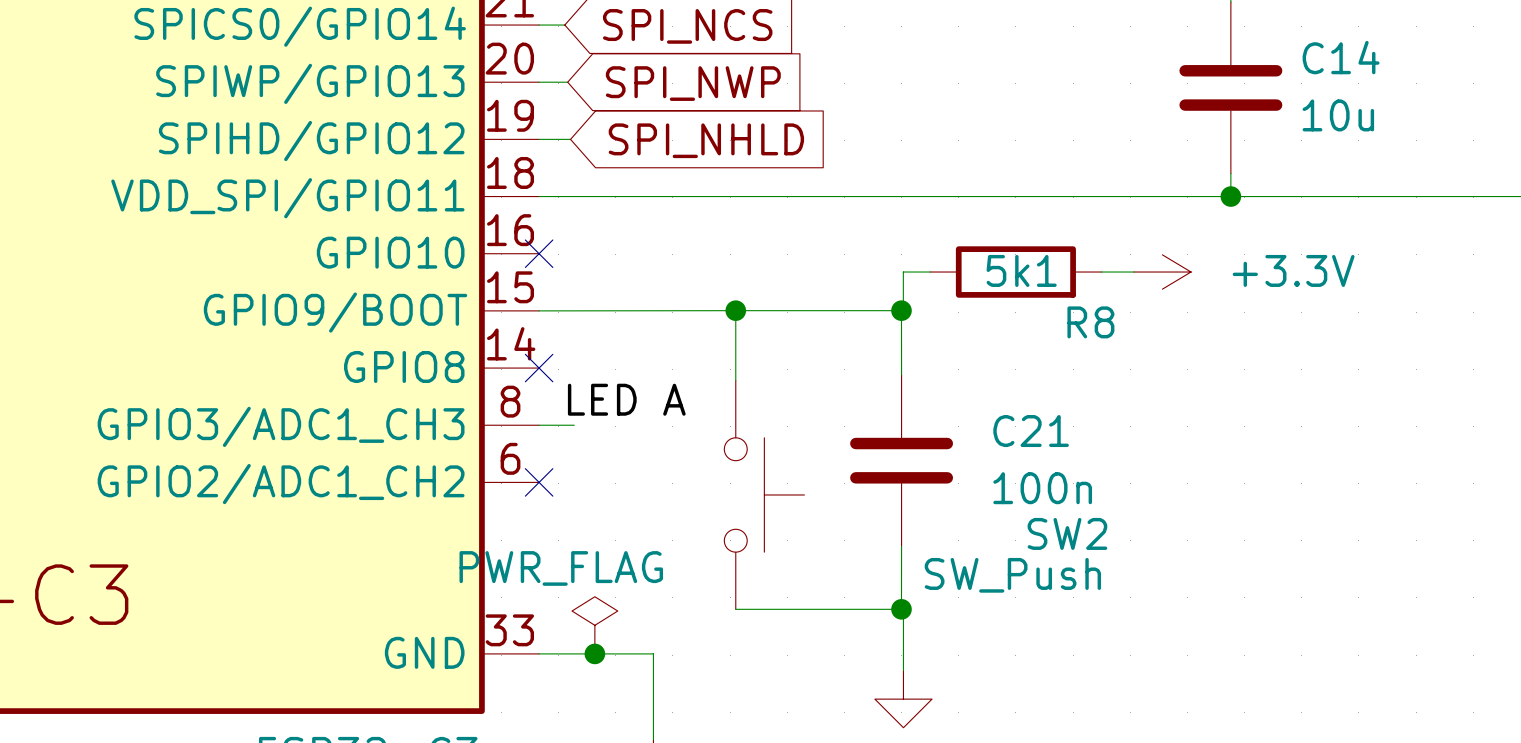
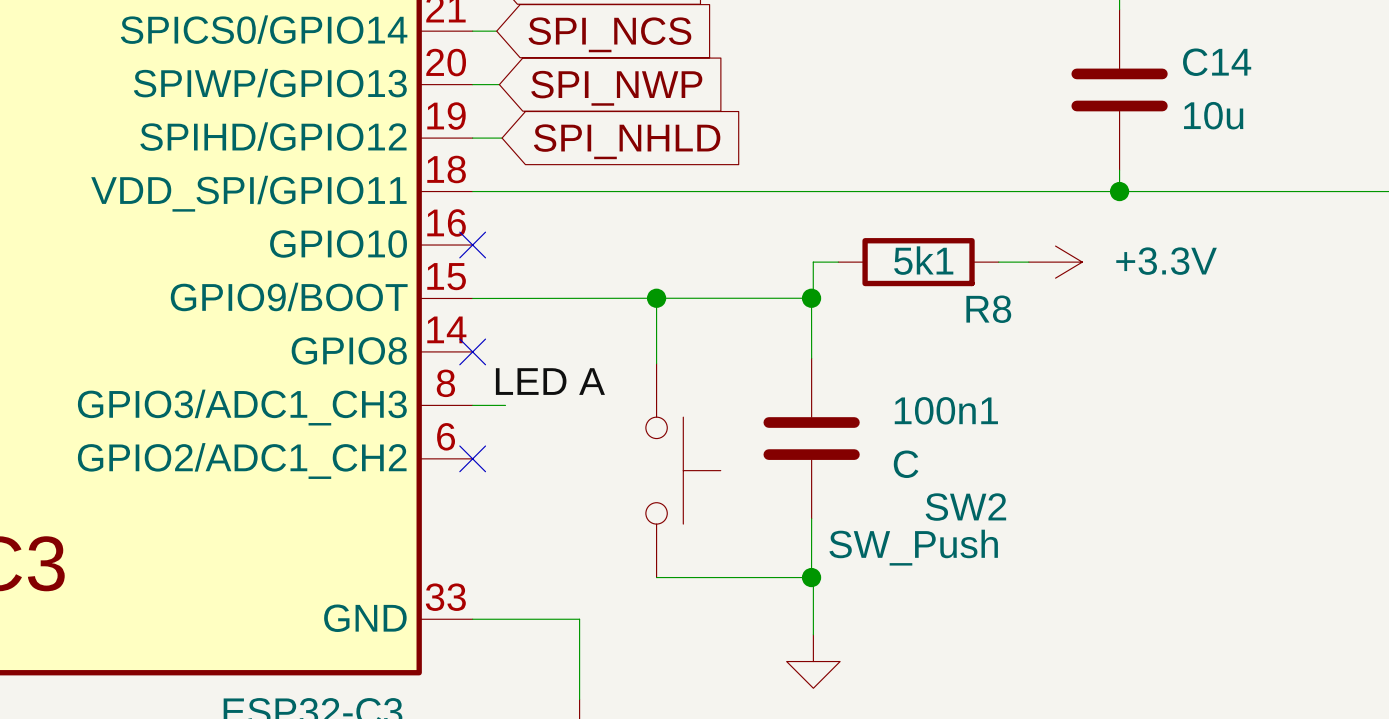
C21 name: C21 (1031, 431) -> 100n1 (946, 410)
C21 value: 100n (1042, 488) -> C (906, 464)
power symbol: PWR_FLAG (594, 625) -> none
junction: (594, 653) -> none

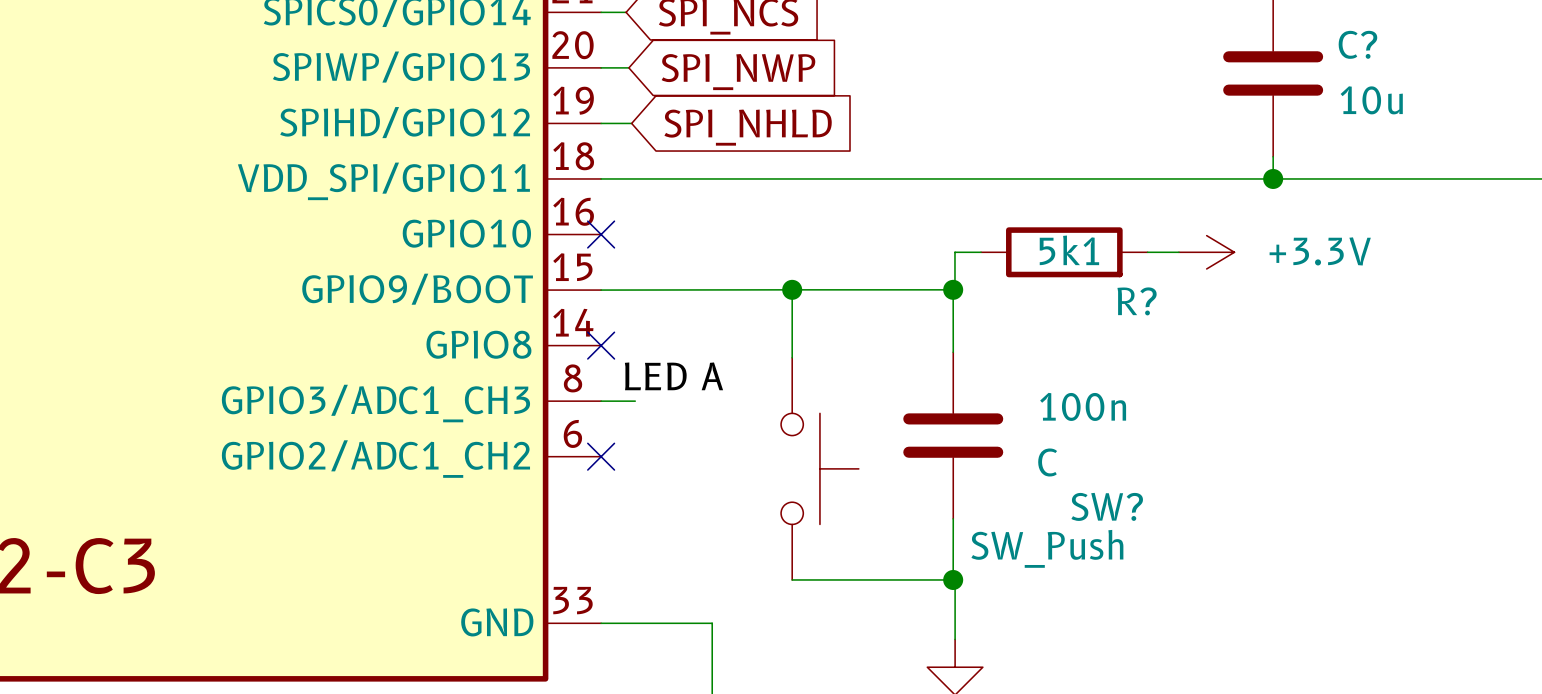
C14 name: C14 (1217, 62) -> C? (1357, 44)
R8 name: R8 (988, 309) -> R? (1137, 301)
100n1 name: 100n1 (946, 410) -> 100n (1083, 406)
SW2 name: SW2 (965, 507) -> SW? (1107, 506)

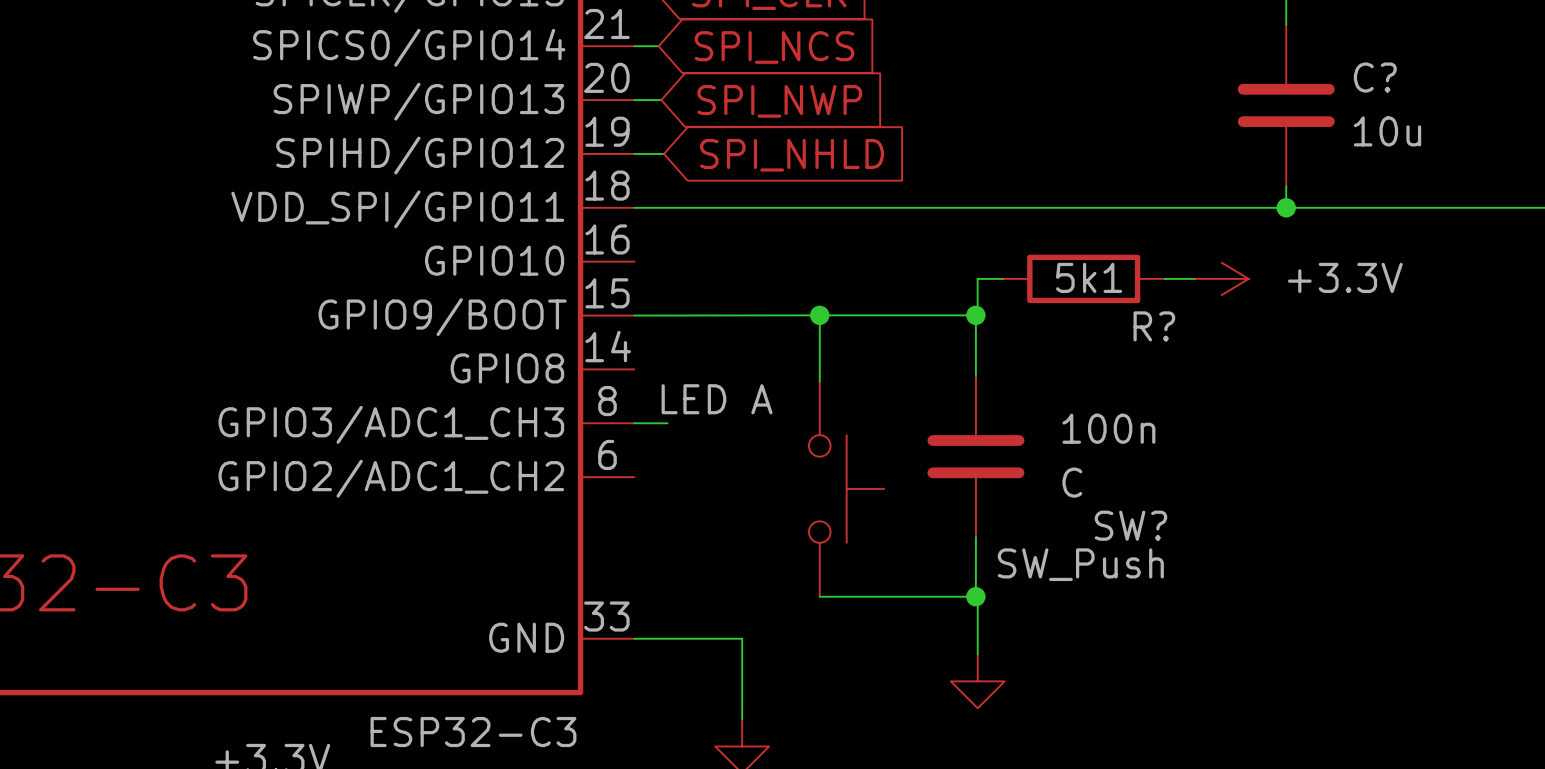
no-connect mark: (601, 234) -> none
no-connect mark: (601, 345) -> none
no-connect mark: (601, 456) -> none

